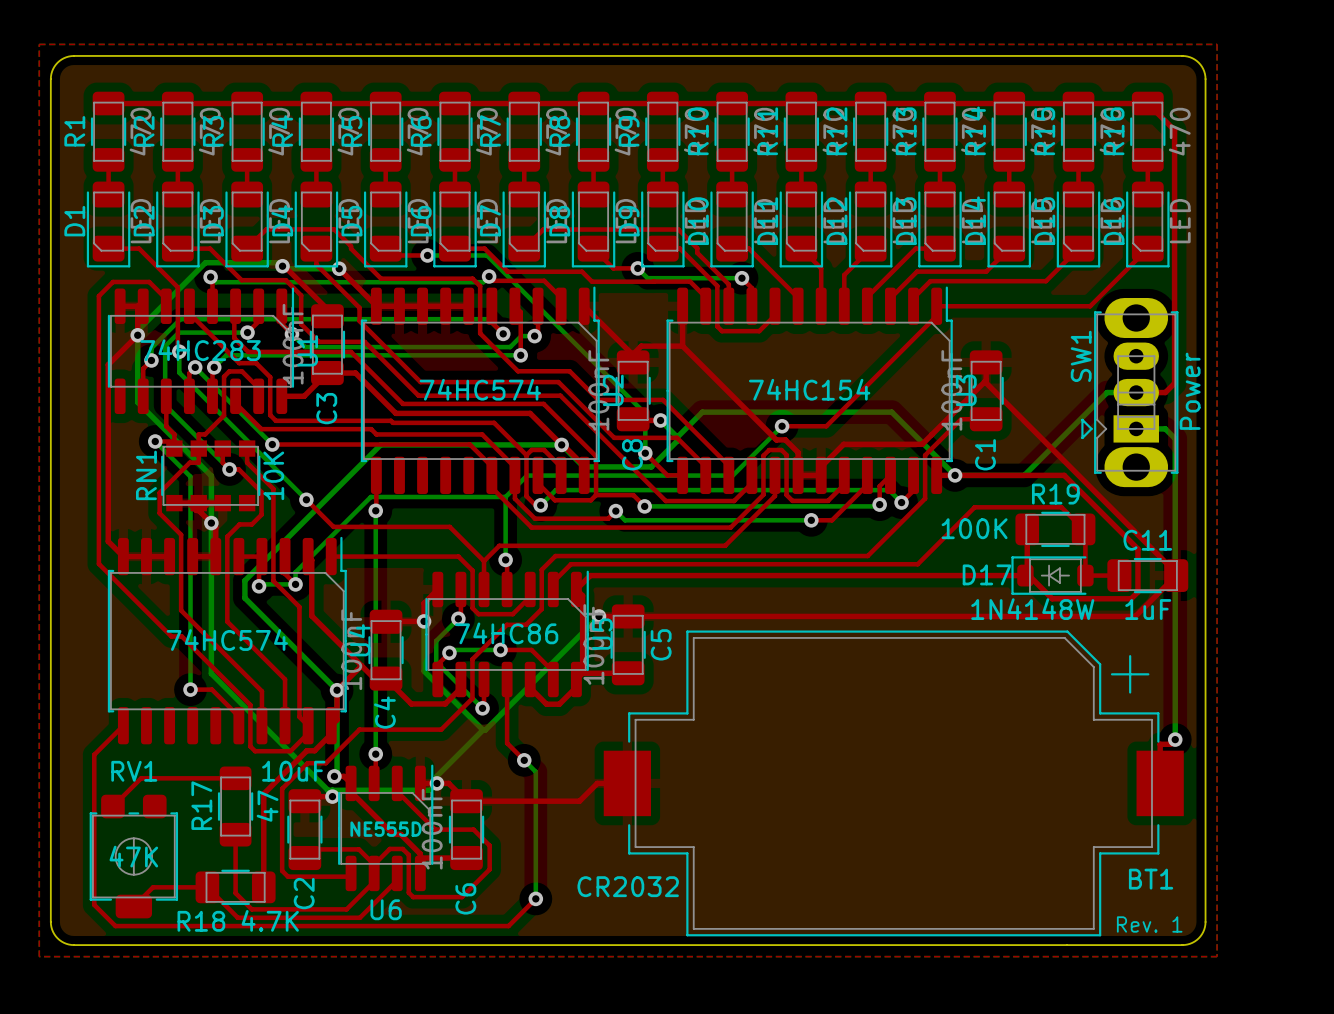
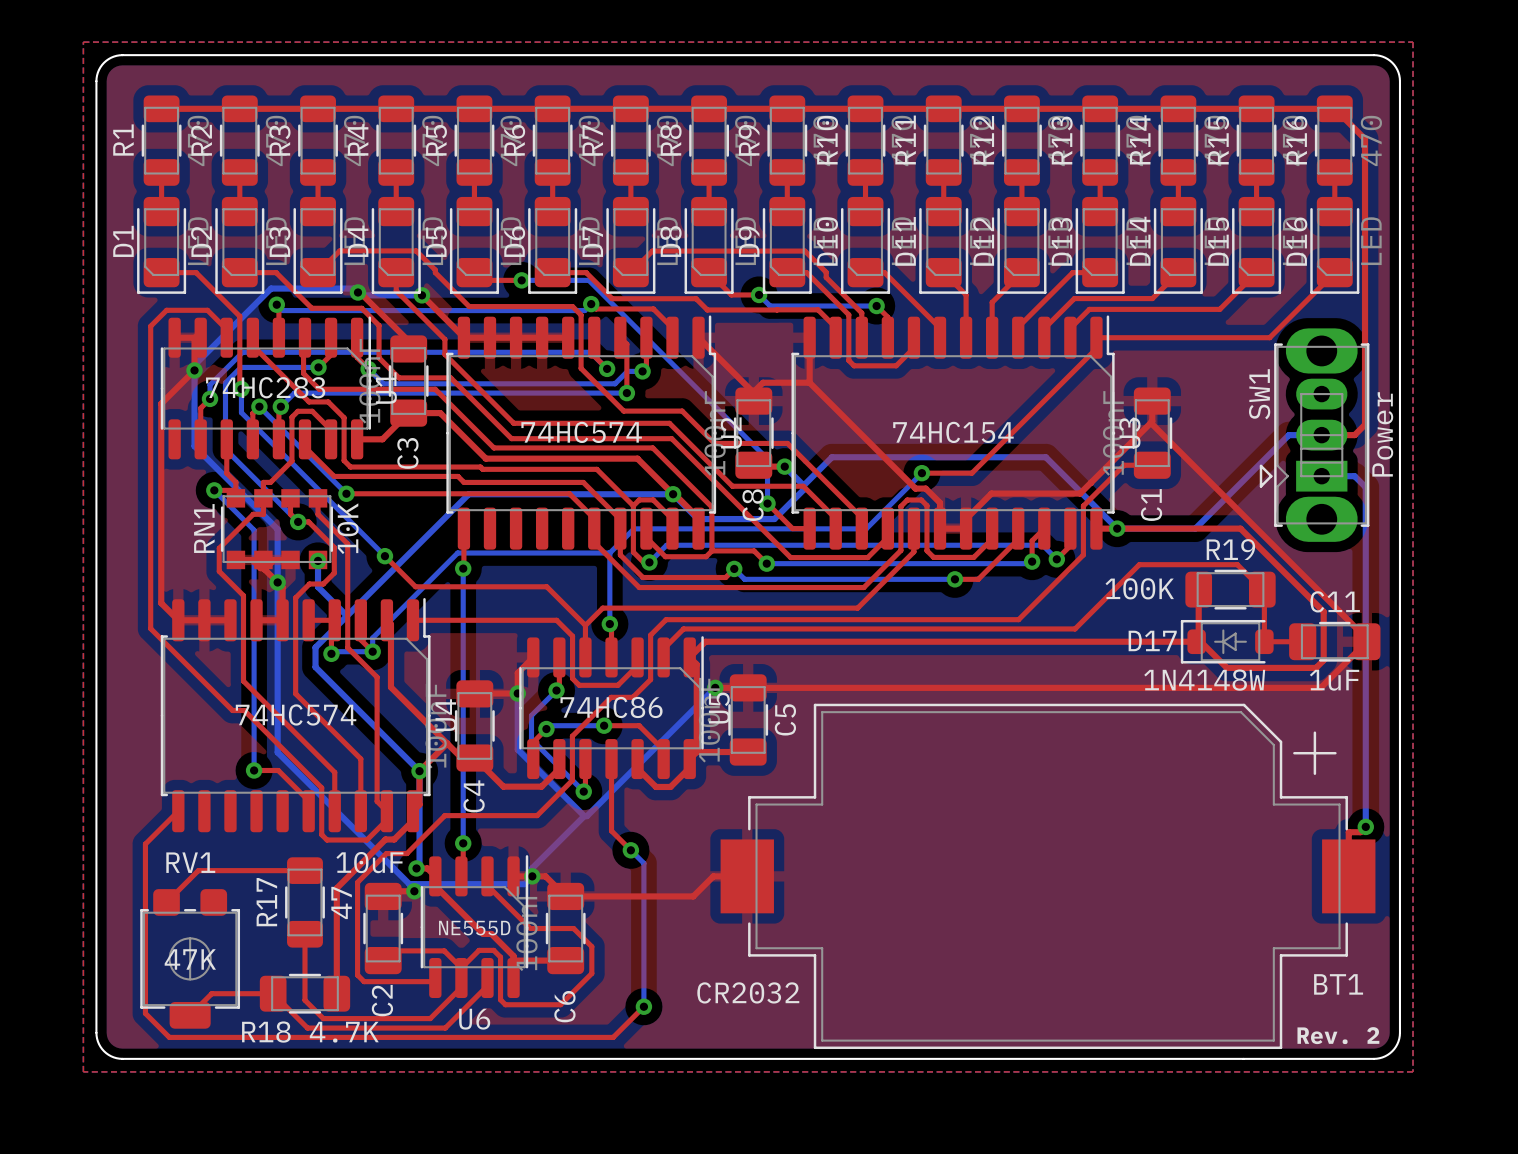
bottom track: none -> (318, 560) (318, 586) (347, 615)
via: none -> (318, 560)
text: Rev. 1 (1149, 924) -> Rev. 2 (1338, 1035)

